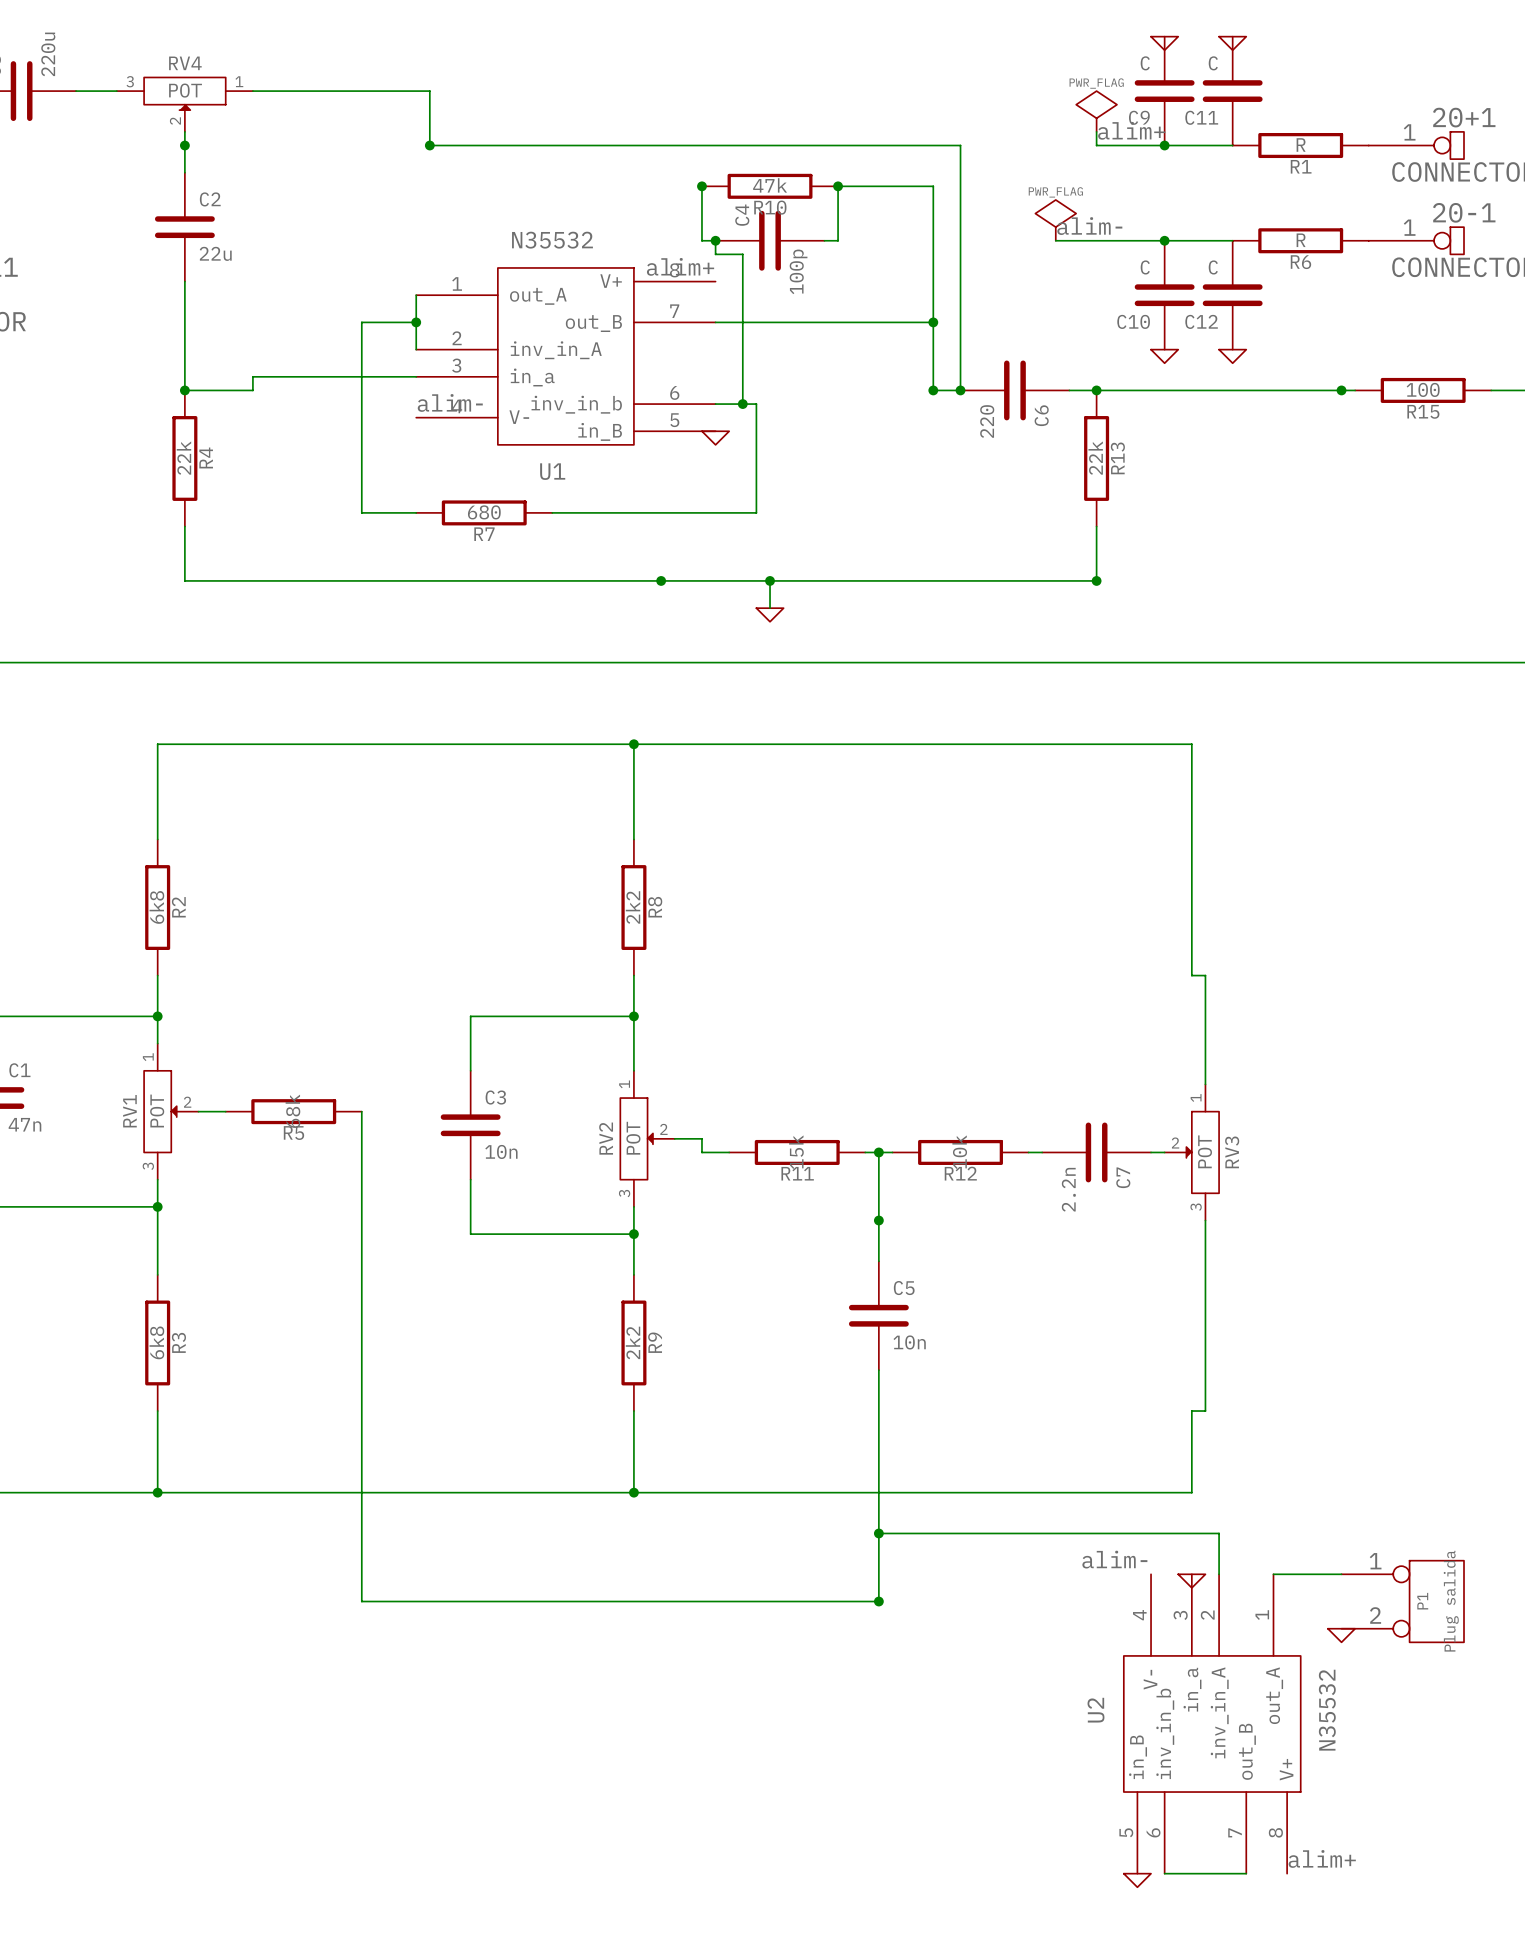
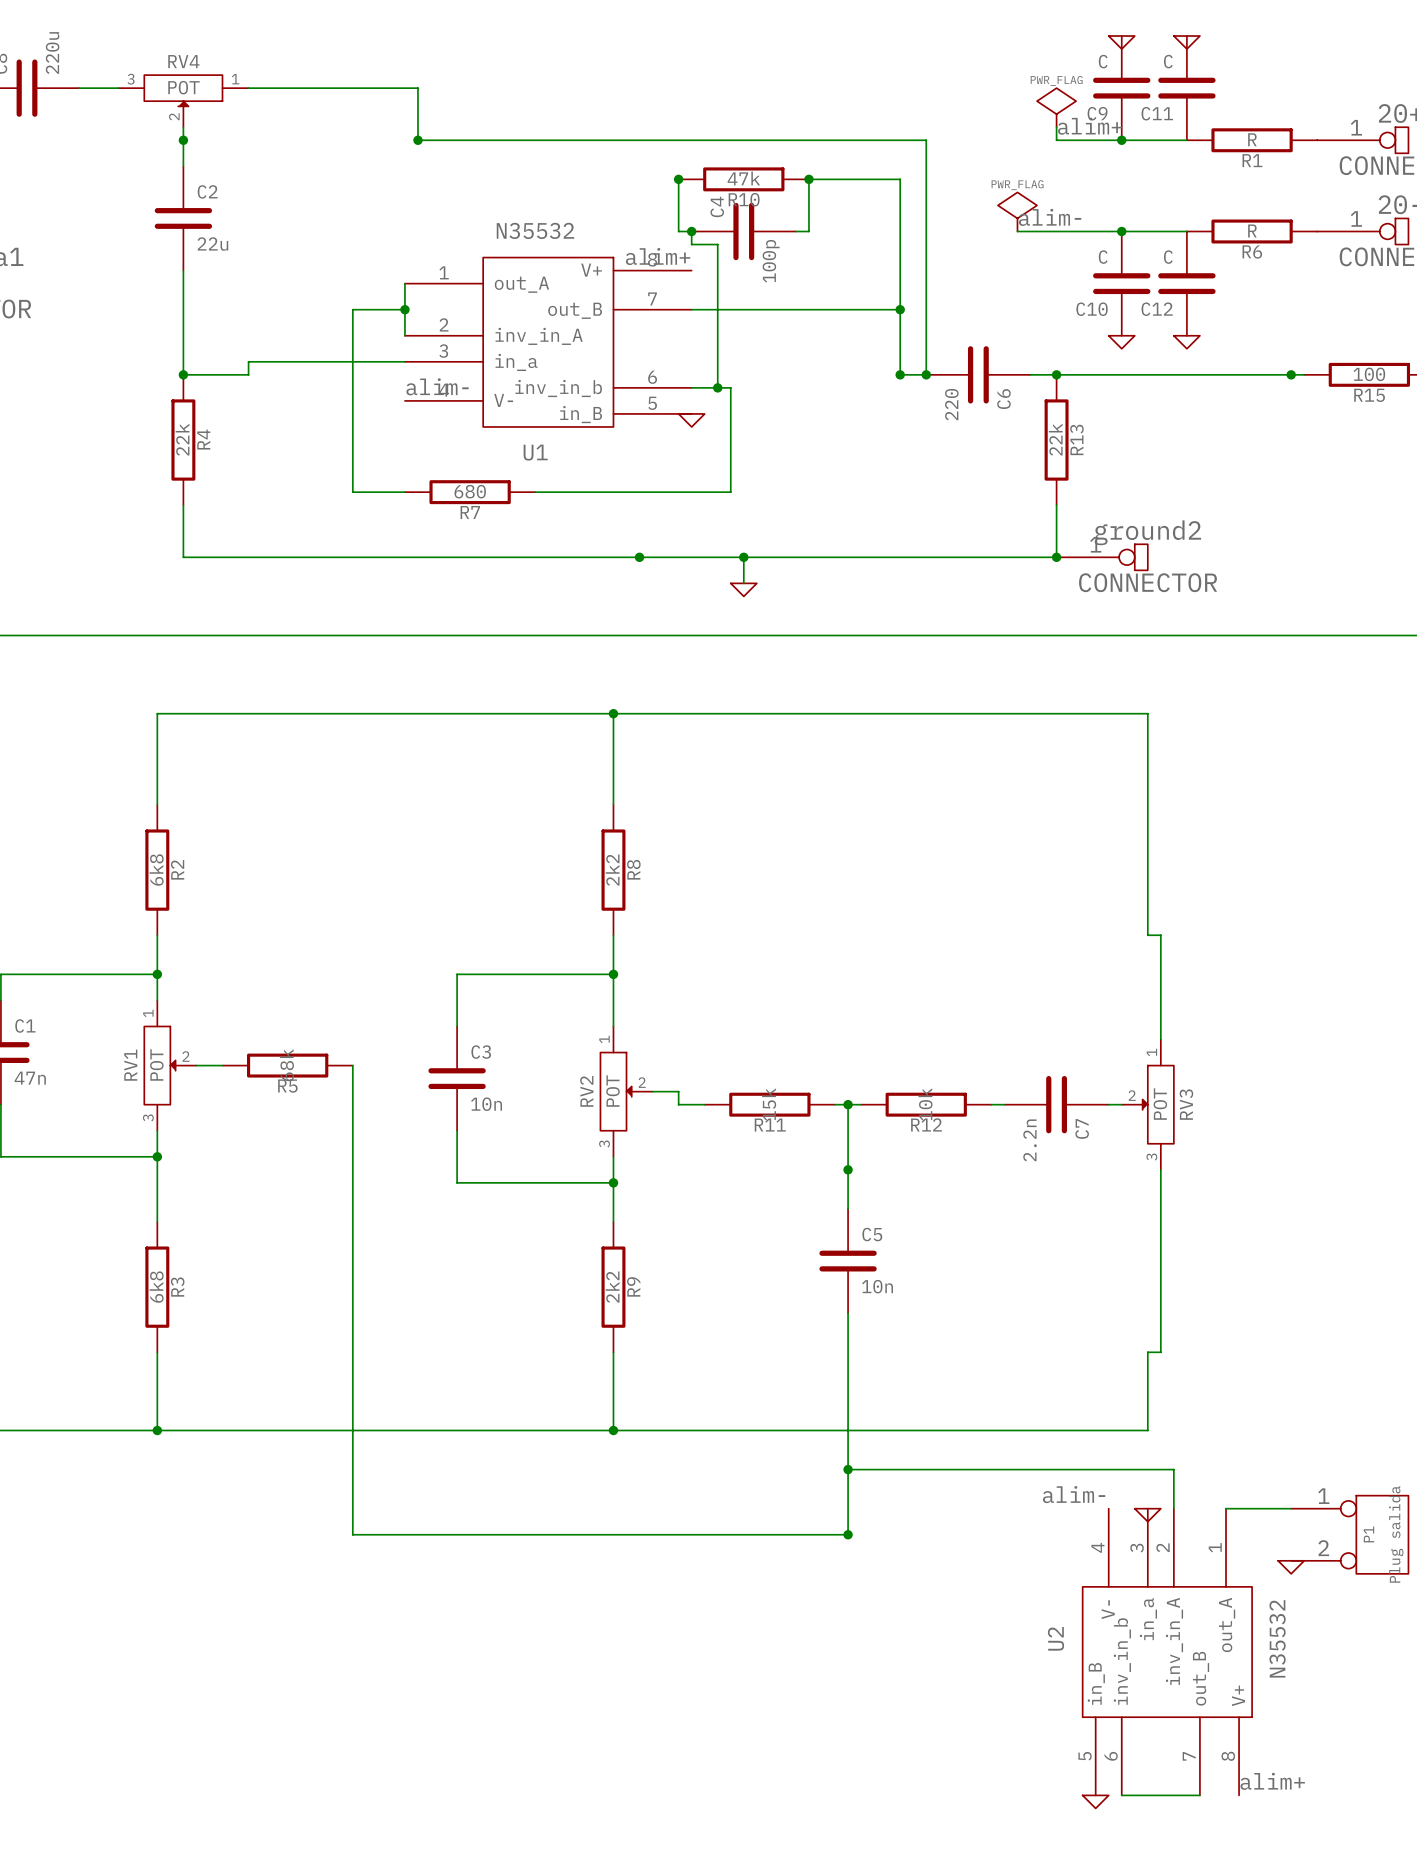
ground2: none -> CONNECTOR (1102, 557)

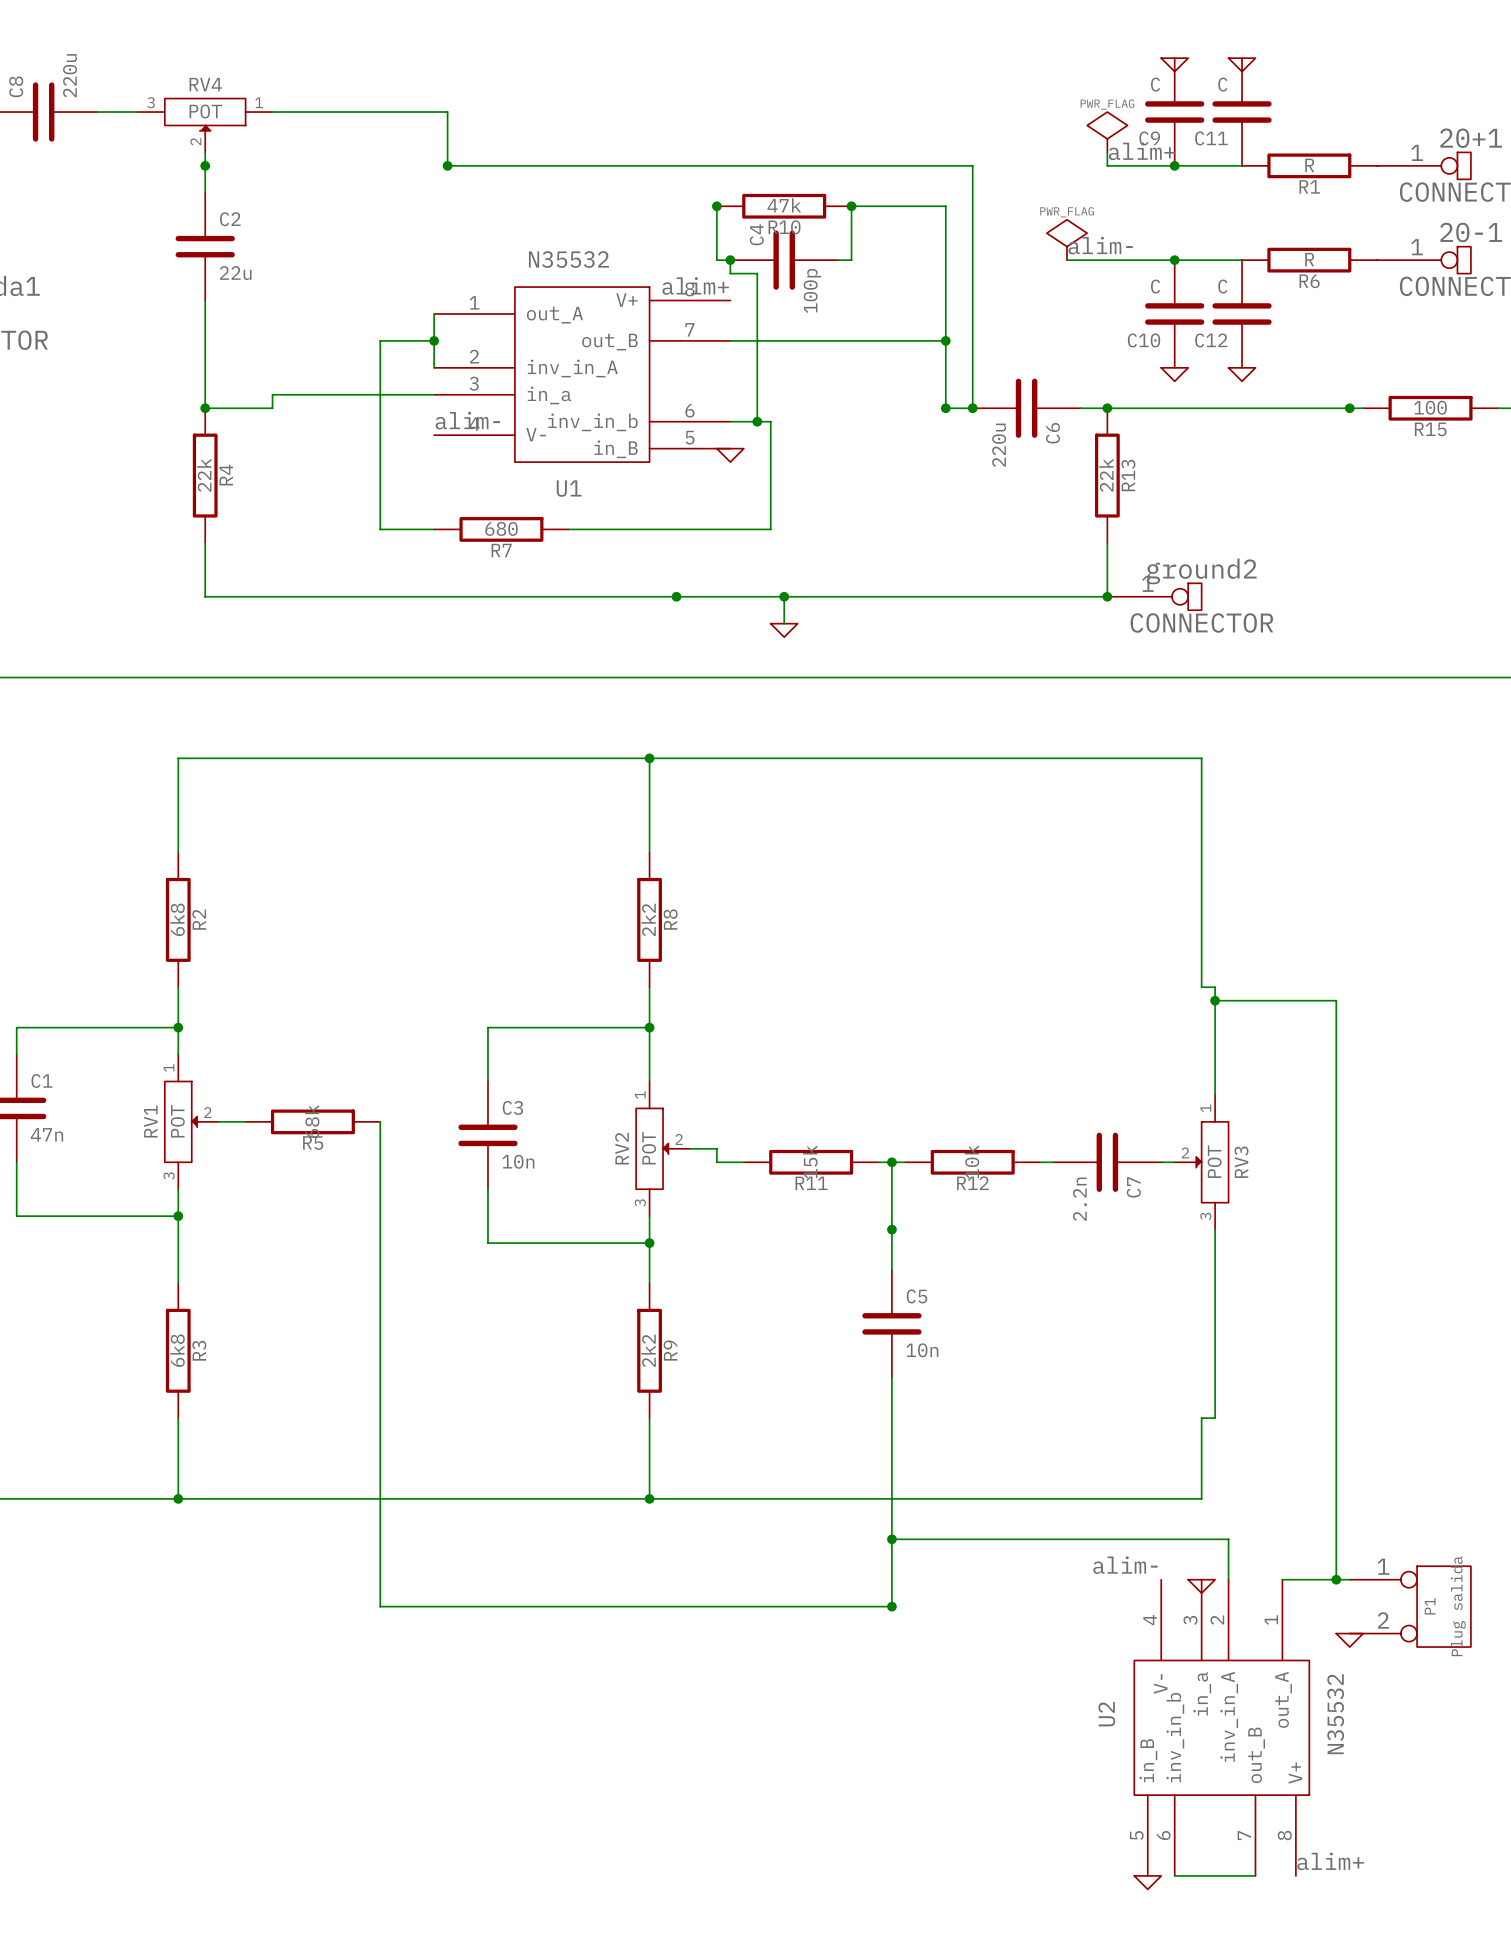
C6 value: 220 (951, 404) -> 220u (999, 445)
wire: none -> (1215, 1000) (1336, 1000) (1336, 1579)
junction: none -> (1215, 1000)
junction: none -> (1336, 1579)

